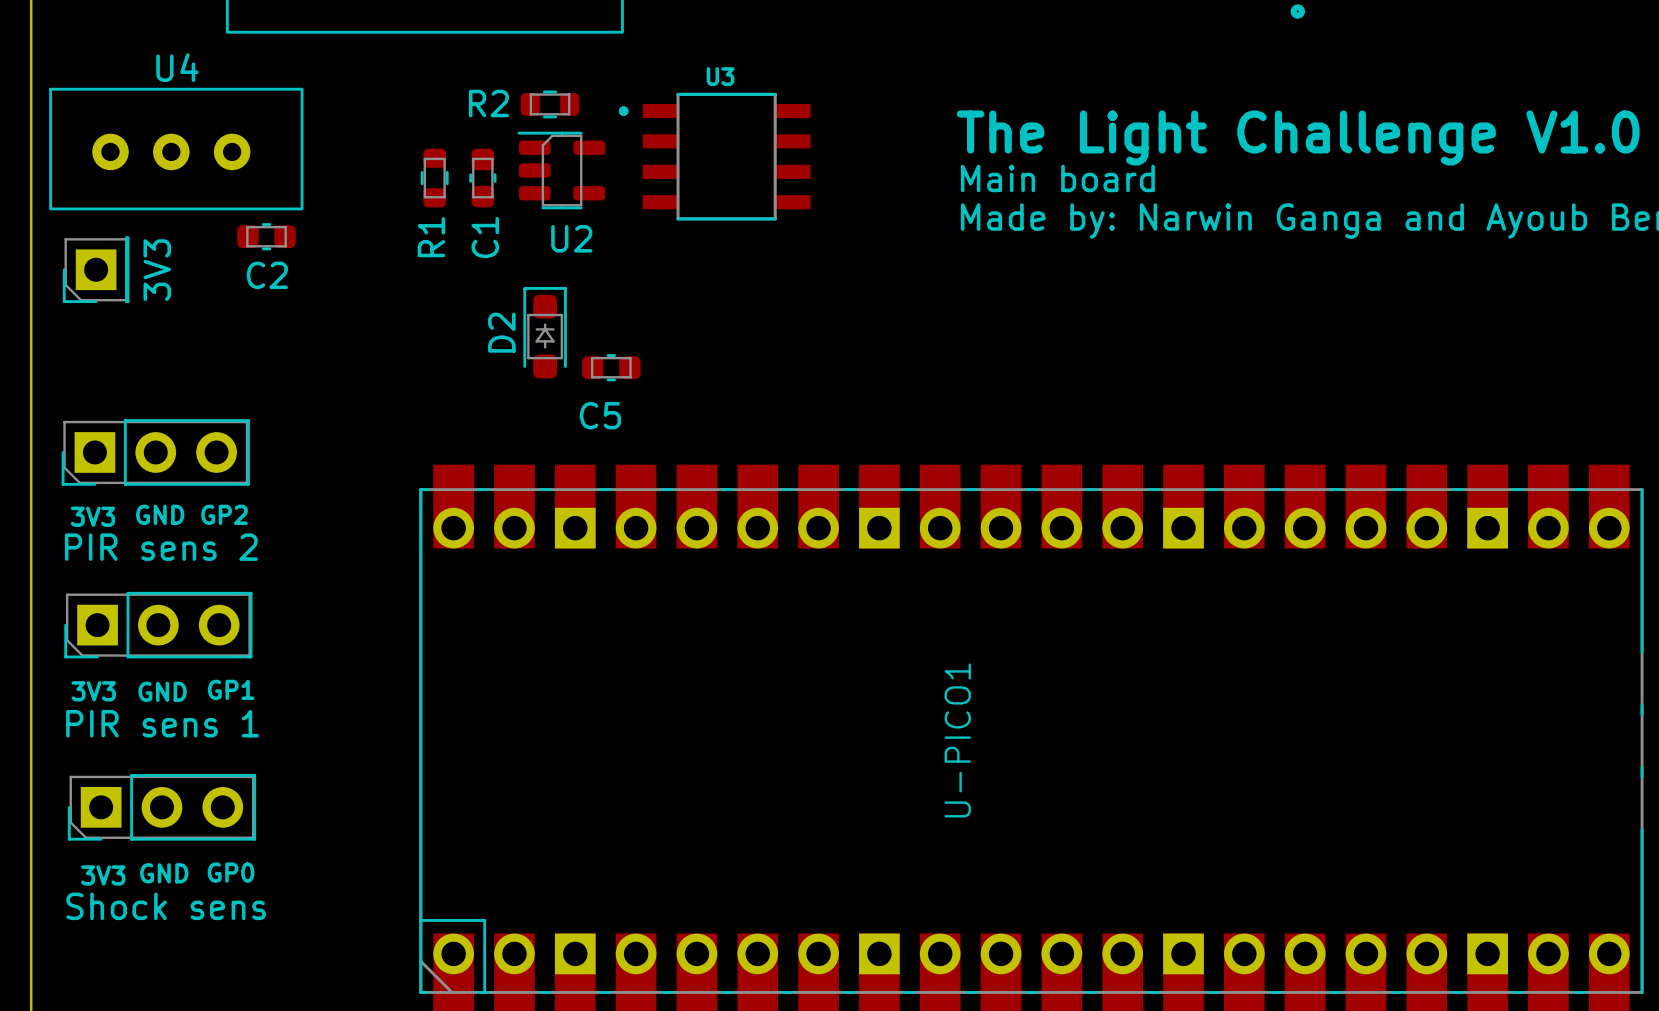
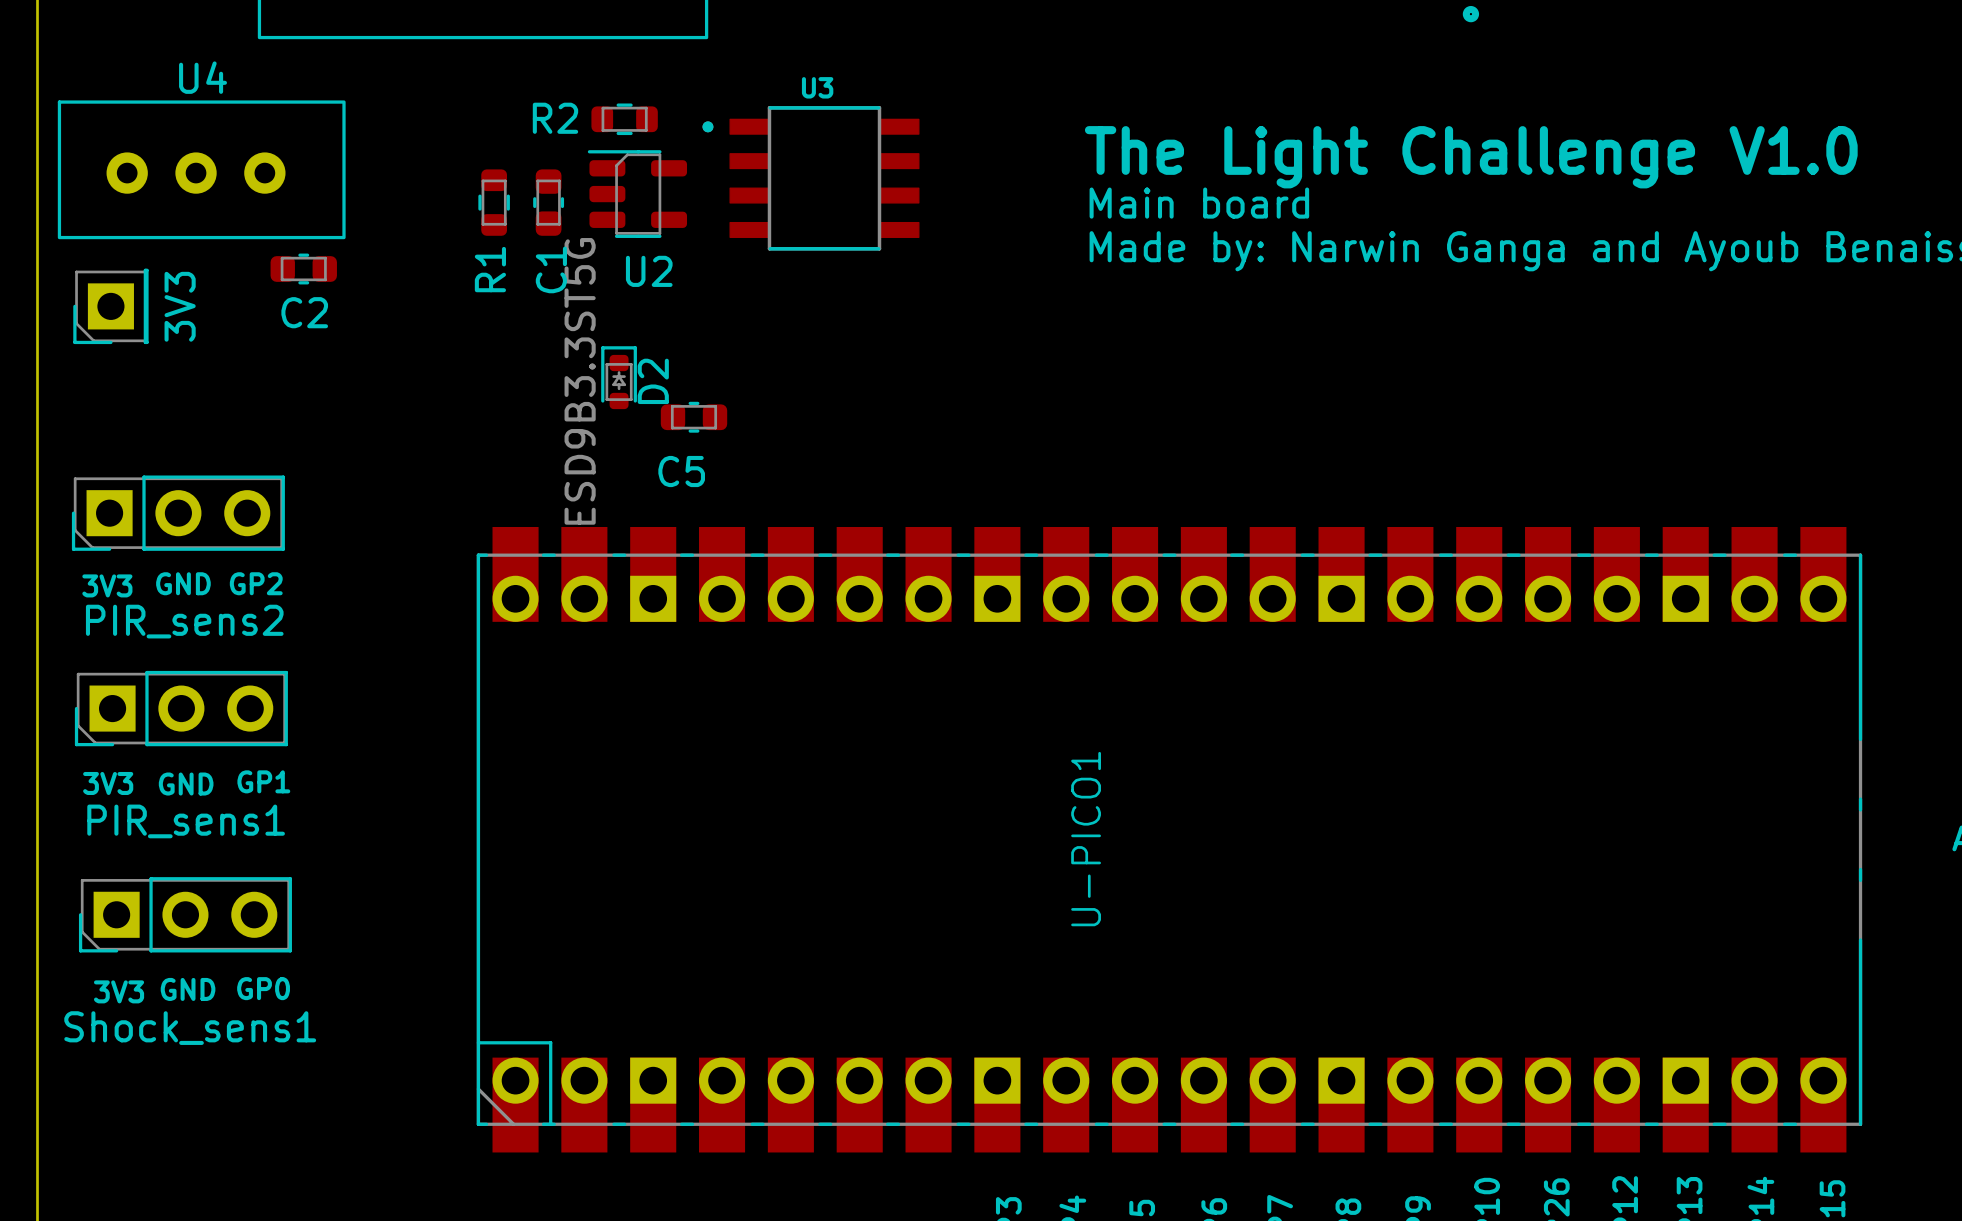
D2 footprint: [523, 287, 567, 379] -> [601, 346, 637, 410]
D2 name position: D2 (501, 332) -> D2 (653, 381)
D2 value: none -> ESD9B3.3ST5G (580, 381)
PIR sens 2 name: PIR sens 2 (161, 547) -> PIR_sens2 (184, 621)
PIR sens 1 name: PIR sens 1 (162, 723) -> PIR_sens1 (186, 821)
Shock sens name: Shock sens (166, 906) -> Shock_sens1 (190, 1028)

